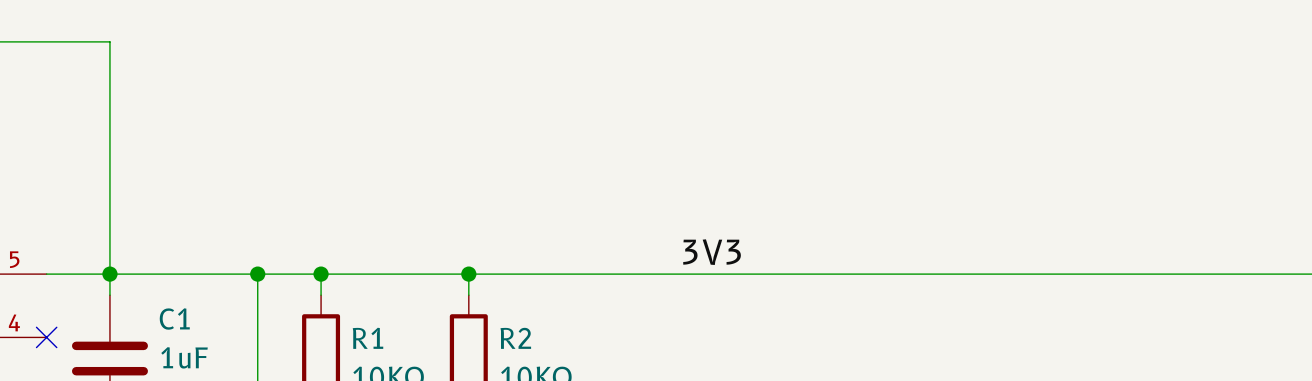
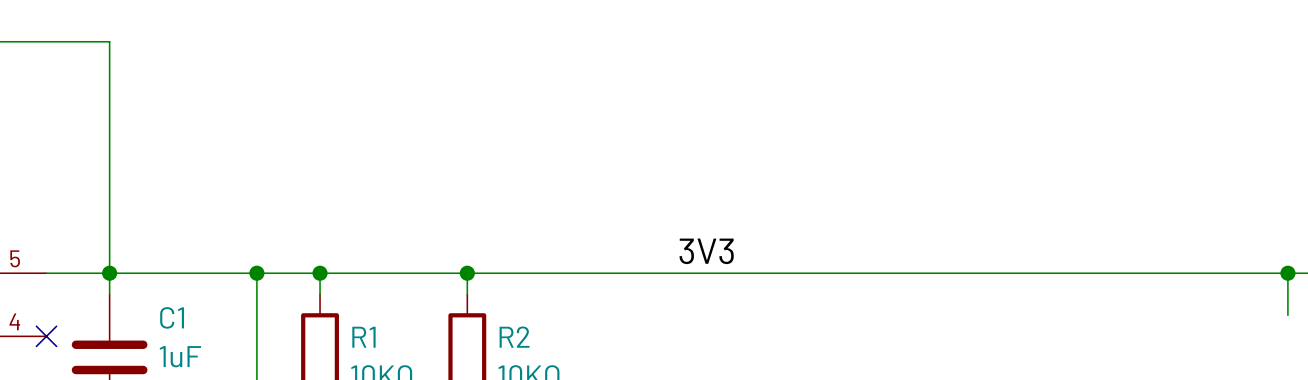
wire: none -> (1287, 273) (1287, 315)
junction: none -> (1287, 273)

